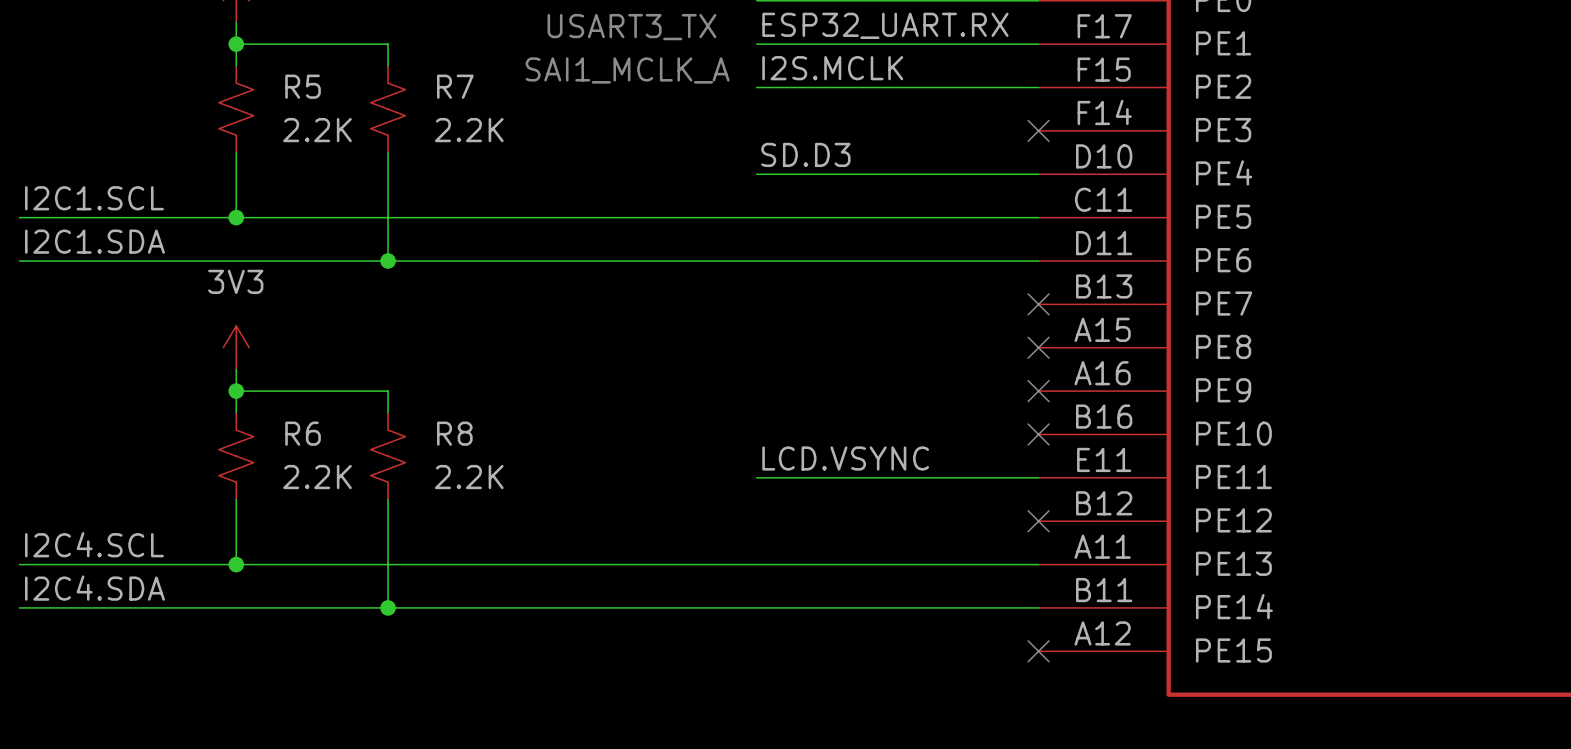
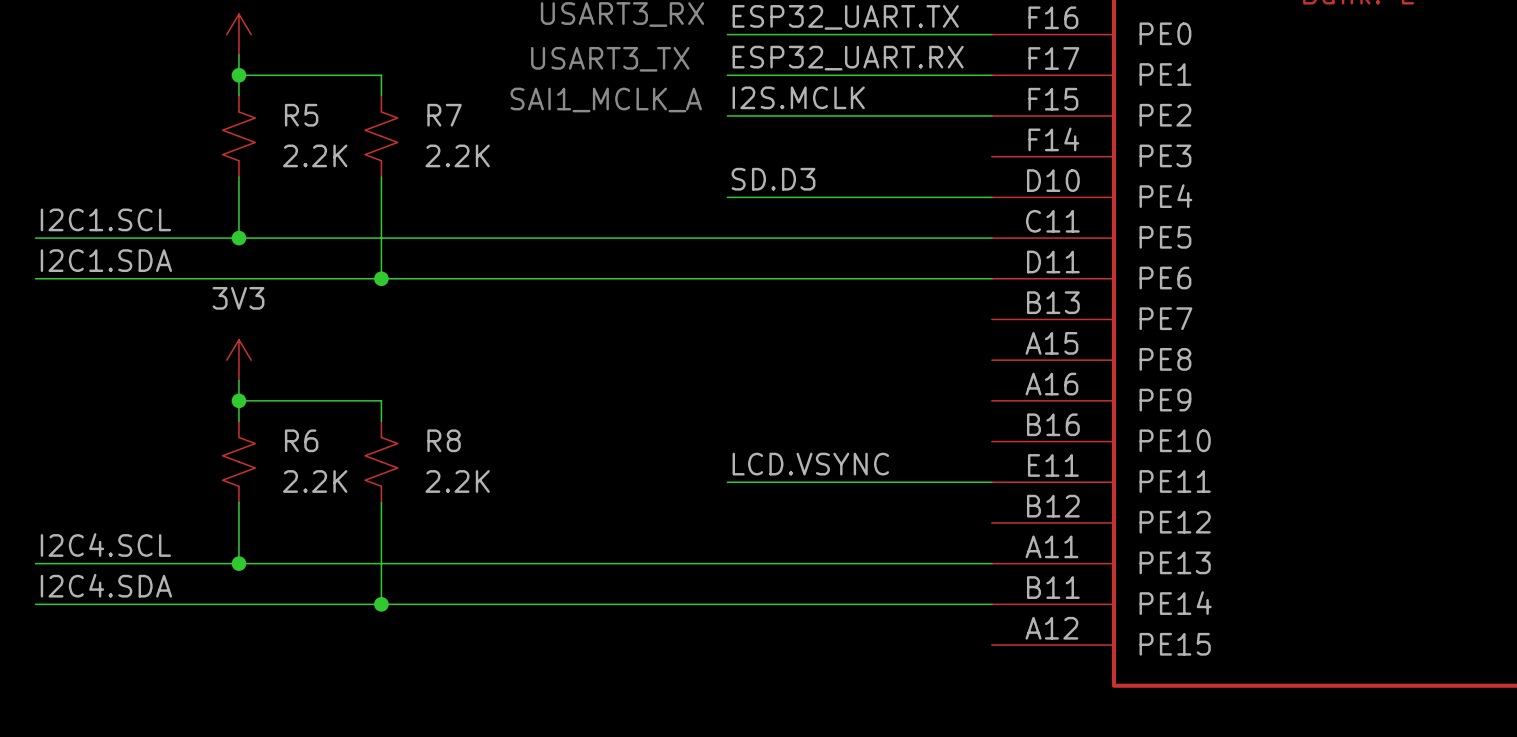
no-connect mark: (1038, 130) -> none
no-connect mark: (1038, 304) -> none
no-connect mark: (1038, 347) -> none
no-connect mark: (1038, 391) -> none
no-connect mark: (1038, 434) -> none
no-connect mark: (1038, 521) -> none
no-connect mark: (1038, 651) -> none

